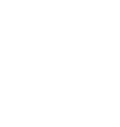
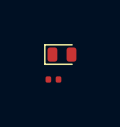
part: none -> (60, 54)
part: none -> (53, 79)

